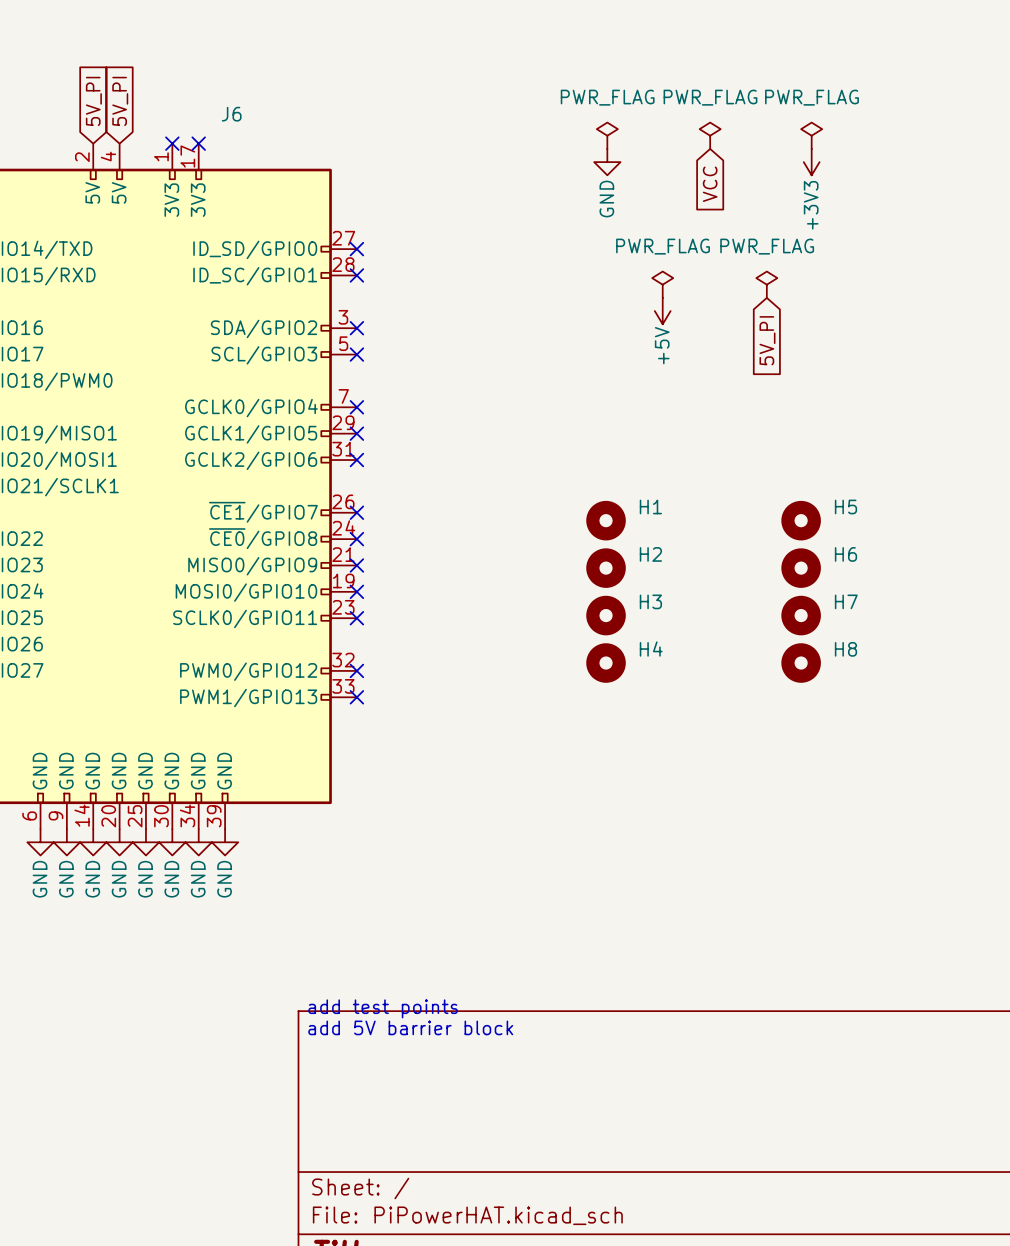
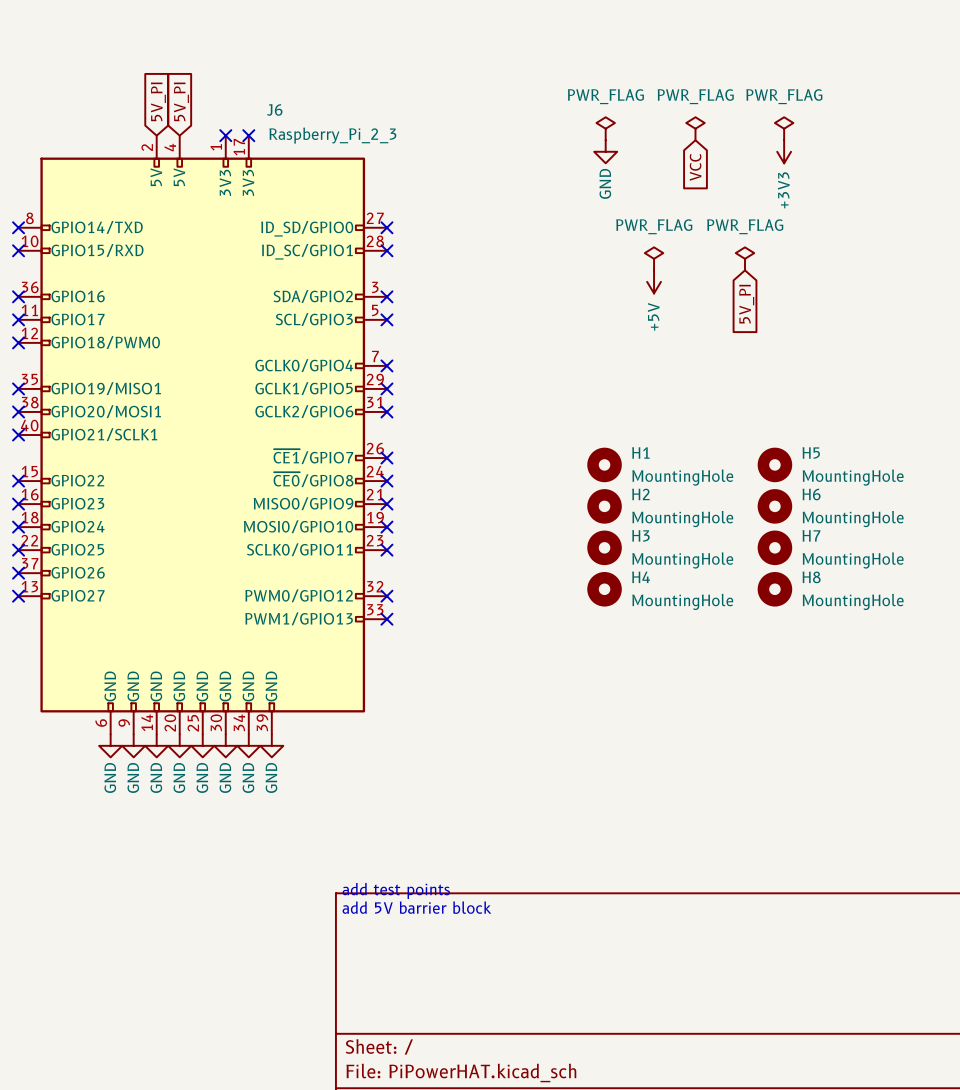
J6 value: none -> Raspberry_Pi_2_3 (332, 135)
H1 value: none -> MountingHole (682, 477)
H5 value: none -> MountingHole (853, 477)
H2 value: none -> MountingHole (682, 519)
H6 value: none -> MountingHole (853, 519)
H3 value: none -> MountingHole (682, 560)
H7 value: none -> MountingHole (853, 560)
H4 value: none -> MountingHole (682, 601)
H8 value: none -> MountingHole (853, 601)

